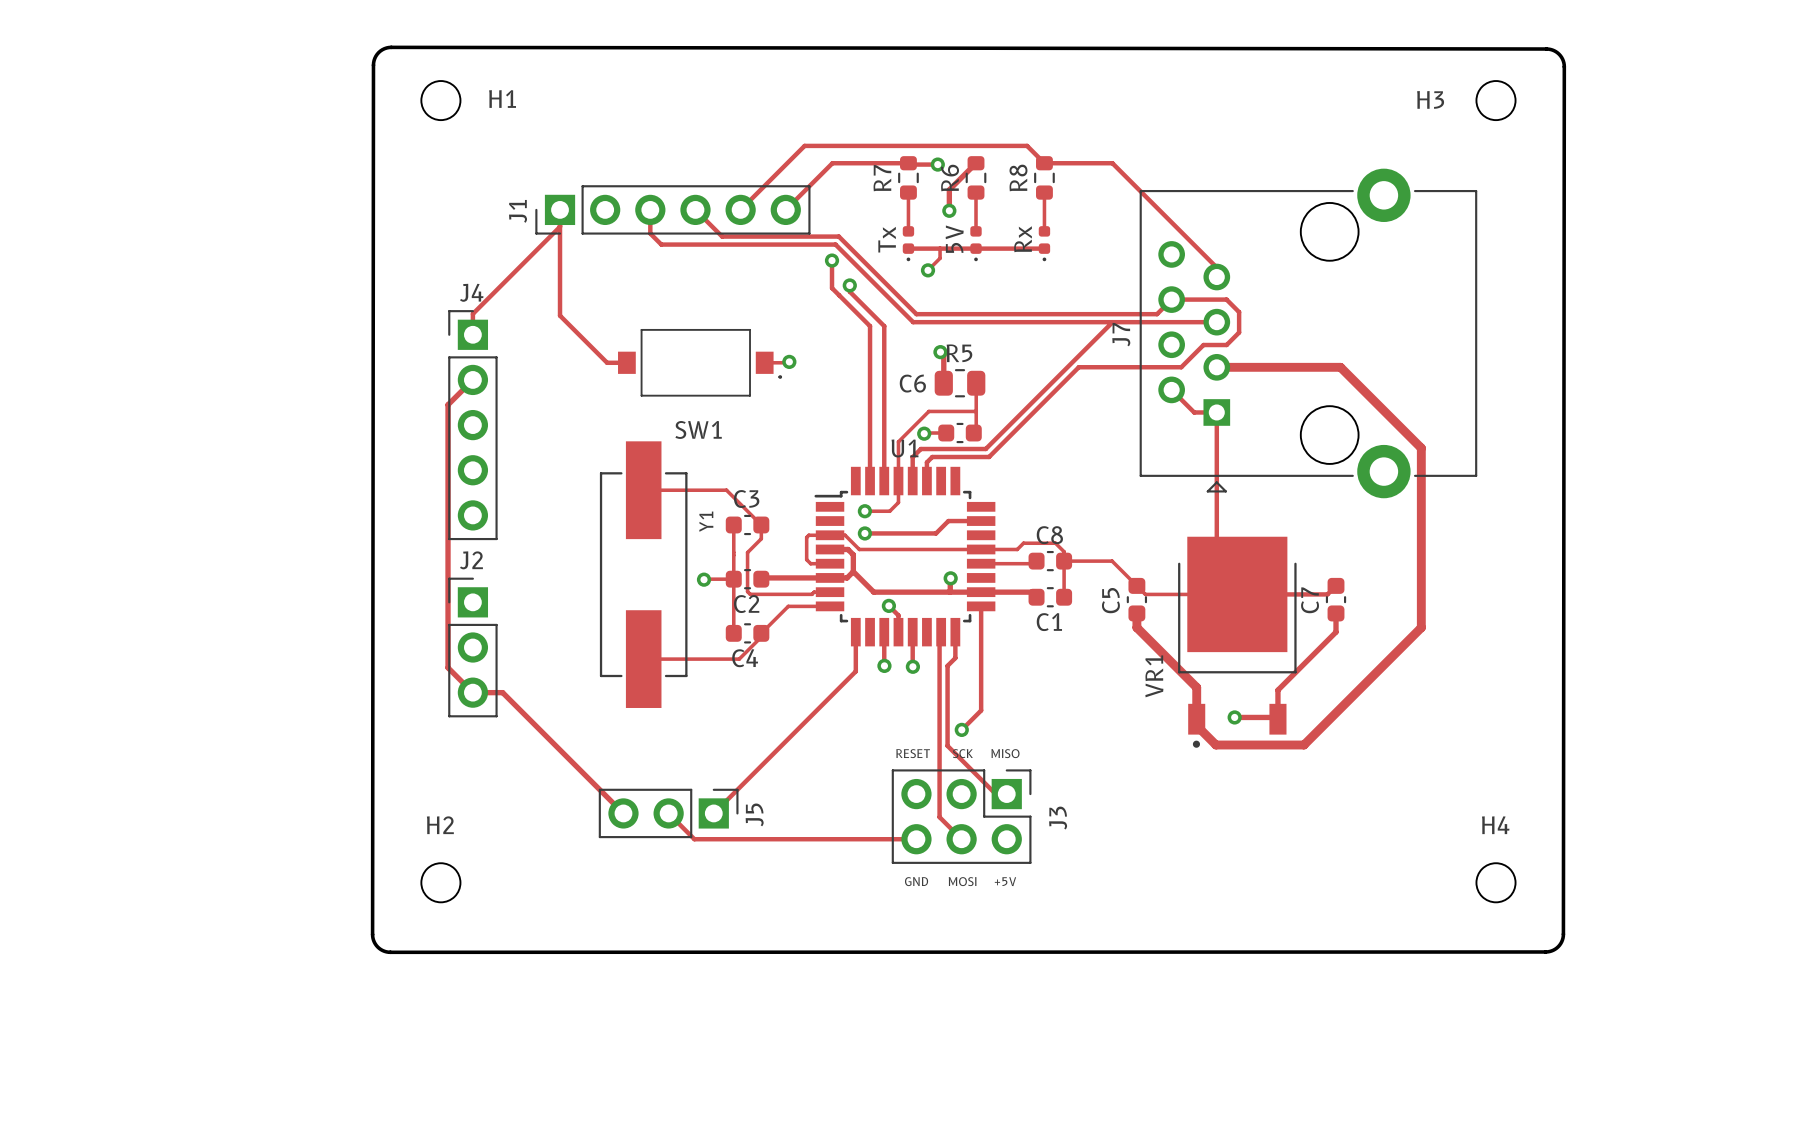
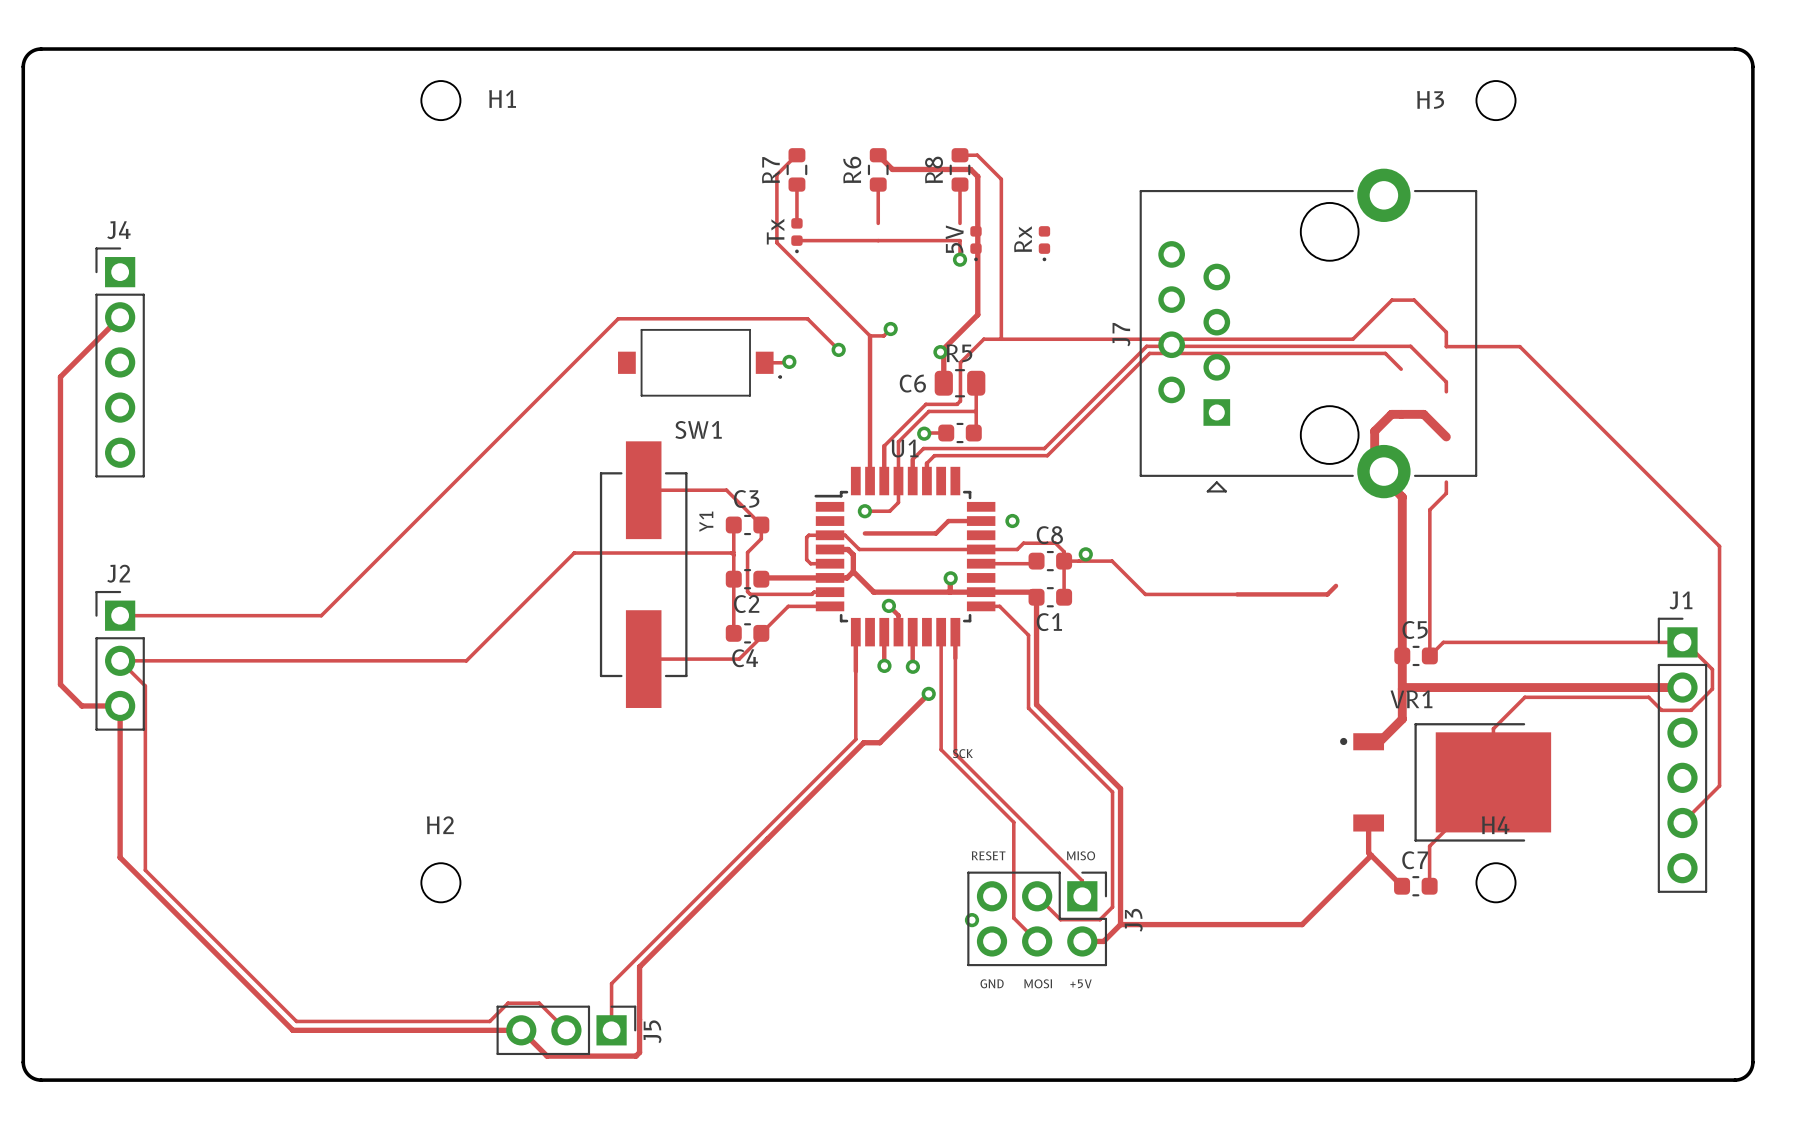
board edge: (391, 47) (1546, 49) (1557, 52) (1562, 59) (1564, 66) (1563, 934) (1559, 945) (1553, 950) (1545, 951) (390, 952) (379, 948) (374, 942) (372, 934) (373, 65) (378, 52) (391, 47) -> (41, 49) (28, 54) (23, 66) (23, 1062) (25, 1070) (31, 1077) (41, 1080) (1735, 1080) (1742, 1078) (1750, 1071) (1752, 1062) (1752, 66) (1751, 59) (1744, 51) (1735, 49) (41, 49)
track: none -> (796, 155) (776, 174) (776, 242) (870, 335) (883, 335) (890, 329)
track: none -> (878, 155) (892, 169) (970, 169) (977, 176) (977, 314) (940, 352)
track: none -> (960, 155) (977, 155) (1001, 179) (1001, 339)
track: (976, 163) (949, 189) (949, 210) -> none
track: (937, 164) (832, 163) (785, 209) -> none
via: (937, 164) -> none
R7 position: (908, 177) -> (796, 169)
R6 position: (976, 177) -> (878, 169)
R8 position: (1044, 177) -> (960, 169)
track: (908, 192) (908, 231) -> (878, 184) (878, 223)
track: (976, 192) (976, 231) -> (960, 184) (960, 223)
track: (1044, 192) (1044, 231) -> (796, 184) (796, 223)
track: (560, 209) (560, 315) (607, 362) (626, 362) -> none
track: (650, 209) (650, 233) (661, 244) (835, 244) (913, 322) (1216, 322) -> none
J1 rotation: 0° (672, 209) -> 90° clockwise (1682, 755)
J1 position: (672, 209) -> (1682, 755)
track: (695, 209) (722, 236) (838, 236) (916, 314) (1157, 314) (1171, 299) (1226, 299) (1239, 312) (1239, 332) (1226, 345) (1203, 345) (1181, 367) (1078, 367) (989, 457) (932, 457) (926, 463) -> (1401, 369) (1385, 353) (1149, 353) (1047, 455) (934, 455) (926, 463)
track: (740, 209) (804, 145) (1027, 145) (1044, 163) (1112, 163) (1216, 267) (1216, 277) -> none
via: (949, 210) -> none
track: (560, 226) (472, 313) (472, 334) -> none
track: none -> (796, 240) (960, 240) (960, 259)
Tx position: (908, 243) -> (796, 235)
track: (908, 248) (1044, 248) -> none
track: (940, 248) (940, 258) (928, 270) -> none
via: none -> (960, 259)
track: (832, 260) (832, 288) (870, 326) (870, 335) -> none
via: (832, 260) -> none
via: (928, 270) -> none
track: (849, 285) (849, 291) (884, 326) (884, 446) -> (1682, 823) (1719, 785) (1719, 546) (1519, 346) (1446, 346) (1446, 332) (1414, 300) (1392, 300) (1352, 339) (983, 339) (960, 362) (960, 401) (957, 404) (925, 404) (884, 446)
via: (849, 285) -> none
track: none -> (120, 317) (60, 376) (60, 684) (81, 705) (120, 705) (120, 857) (292, 1030) (521, 1030) (547, 1056) (636, 1056) (639, 1052) (639, 966) (863, 742) (879, 742) (928, 693)
track: (1112, 322) (985, 449) (920, 449) (912, 459) -> (1446, 391) (1446, 382) (1410, 346) (1146, 346) (1044, 448) (923, 448) (912, 459)
via: none -> (890, 329)
track: none -> (838, 349) (807, 318) (618, 318) (321, 615) (120, 615)
via: none -> (838, 349)
track: (1216, 367) (1340, 367) (1421, 448) (1421, 627) (1304, 745) (1216, 745) (1196, 725) (1196, 687) (1136, 627) (1136, 613) -> none
track: (472, 379) (448, 404) (448, 667) (472, 692) (502, 692) (623, 813) -> none
track: (1171, 389) (1194, 412) (1216, 412) (1216, 573) (1237, 594) -> none
J4 position: (472, 425) -> (120, 362)
track: none -> (1446, 436) (1423, 414) (1391, 414) (1374, 431) (1374, 469) (1402, 497) (1402, 719) (1379, 741) (1368, 741)
track: none -> (1446, 482) (1446, 493) (1429, 509) (1429, 655) (1443, 642) (1685, 642) (1712, 669) (1712, 688) (1691, 710) (1661, 710) (1648, 697) (1524, 697) (1493, 728) (1493, 782) (1429, 846) (1429, 886)
via: none -> (1012, 521)
via: (864, 533) -> none
via: none -> (1085, 554)
track: none -> (733, 555) (731, 553) (574, 553) (466, 660) (120, 660) (145, 686) (145, 870) (296, 1021) (489, 1021) (508, 1003) (539, 1003) (566, 1030)
via: (704, 579) -> none
track: (733, 579) (704, 579) -> none
track: none -> (1036, 597) (1036, 704) (1120, 788) (1120, 924)
C5 rotation: 0° (1136, 599) -> 90° clockwise (1416, 655)
C5 position: (1136, 599) -> (1416, 655)
C7 rotation: 0° (1336, 599) -> 90° clockwise (1415, 886)
C7 position: (1336, 599) -> (1415, 886)
track: (981, 606) (981, 710) (961, 729) -> (981, 606) (999, 606) (1028, 635) (1028, 708) (1112, 792) (1112, 907) (1100, 919) (1060, 919) (1037, 896)
track: (1336, 613) (1336, 632) (1277, 690) (1277, 719) (1276, 717) (1234, 717) -> none
track: (941, 632) (939, 633) (939, 817) (961, 839) -> (941, 632) (941, 749) (1013, 822) (1013, 918) (1037, 941)
VR1 rotation: 0° (1237, 642) -> 90° clockwise (1445, 782)
VR1 position: (1237, 642) -> (1445, 782)
J2 position: (472, 647) -> (120, 660)
track: (955, 658) (947, 665) (947, 745) (995, 794) (1006, 794) -> (955, 658) (955, 753) (1082, 880) (1082, 896)
track: (855, 671) (713, 813) -> (855, 671) (855, 739) (611, 983) (611, 1030)
track: none -> (1682, 687) (1402, 688)
via: (1234, 717) -> none
via position: (961, 729) -> (928, 693)
text position: RESET (913, 753) -> RESET (988, 855)
text position: MISO (1005, 753) -> MISO (1081, 855)
track: (668, 813) (694, 839) (916, 839) -> none
J5 position: (668, 813) -> (566, 1030)
J3 position: (961, 816) -> (1037, 918)
track: none -> (1368, 822) (1368, 852) (1402, 886)
track: none -> (1371, 855) (1302, 924) (1120, 924)
text position: GND (916, 881) -> GND (992, 983)
text position: MOSI (962, 881) -> MOSI (1038, 983)
text position: +5V (1005, 881) -> +5V (1081, 983)
via: none -> (972, 920)
track: none -> (1120, 924) (1103, 941) (1082, 941)

